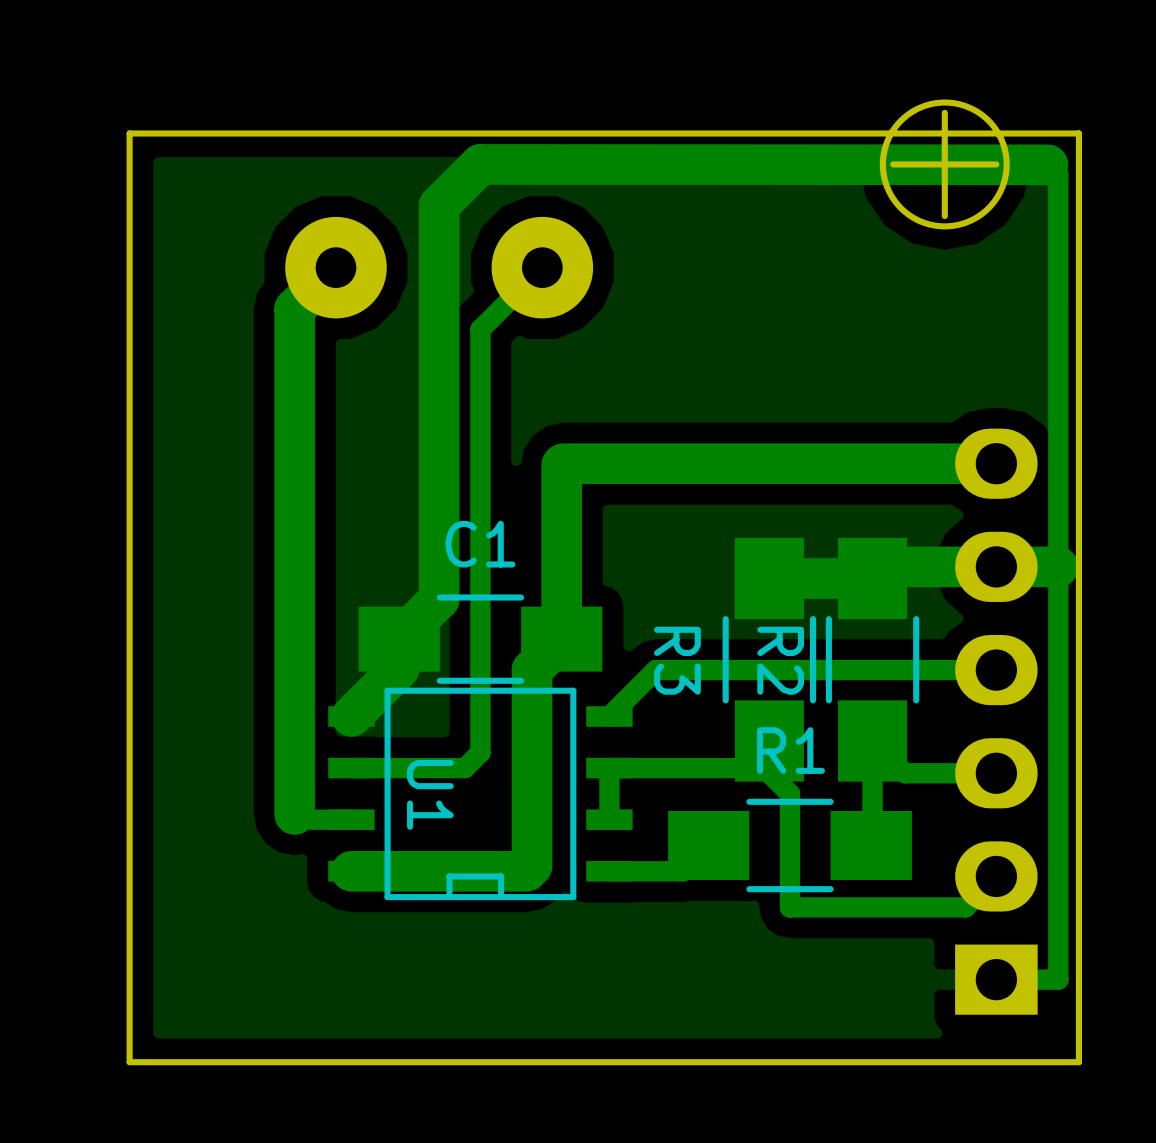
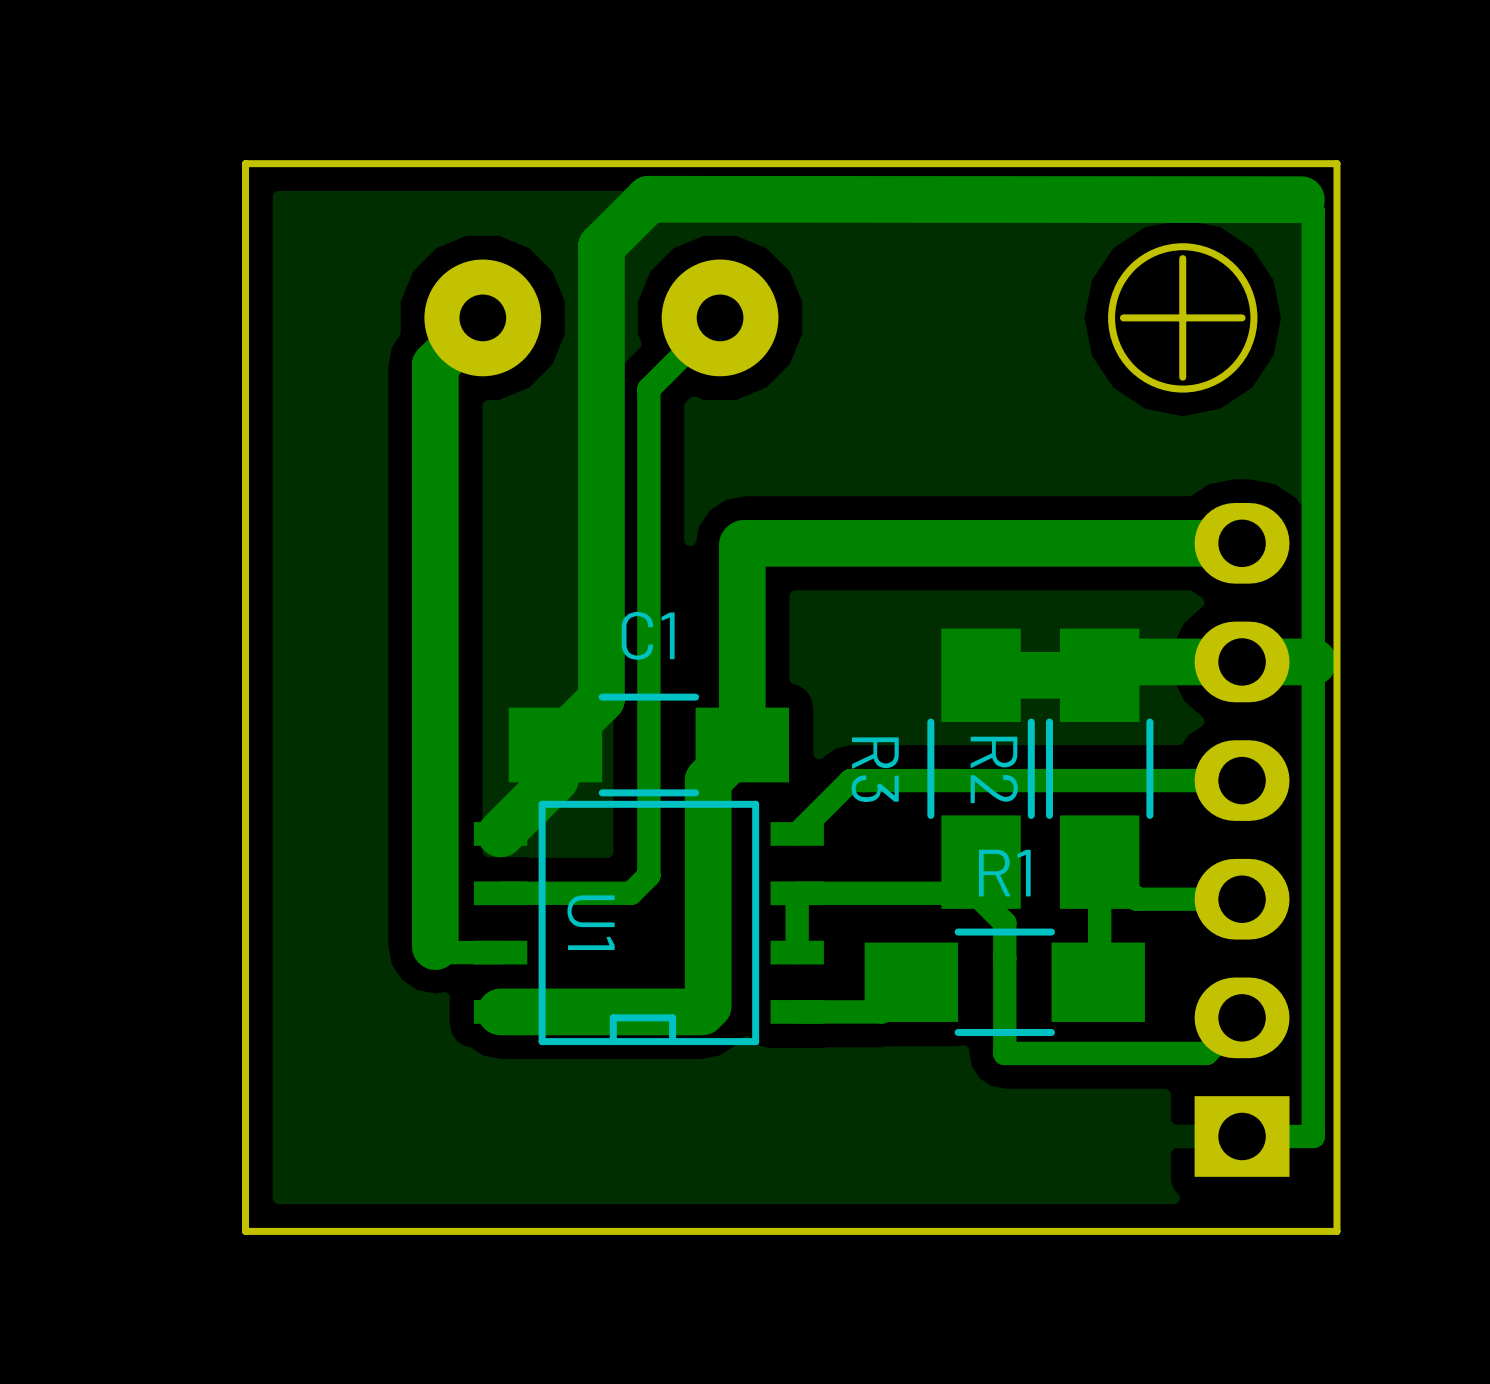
board edge: (944, 112) (944, 216) -> (1182, 377) (1182, 258)
round board edge position: (944, 164) -> (1182, 317)
board edge: (996, 164) (893, 164) -> (1242, 317) (1123, 317)

